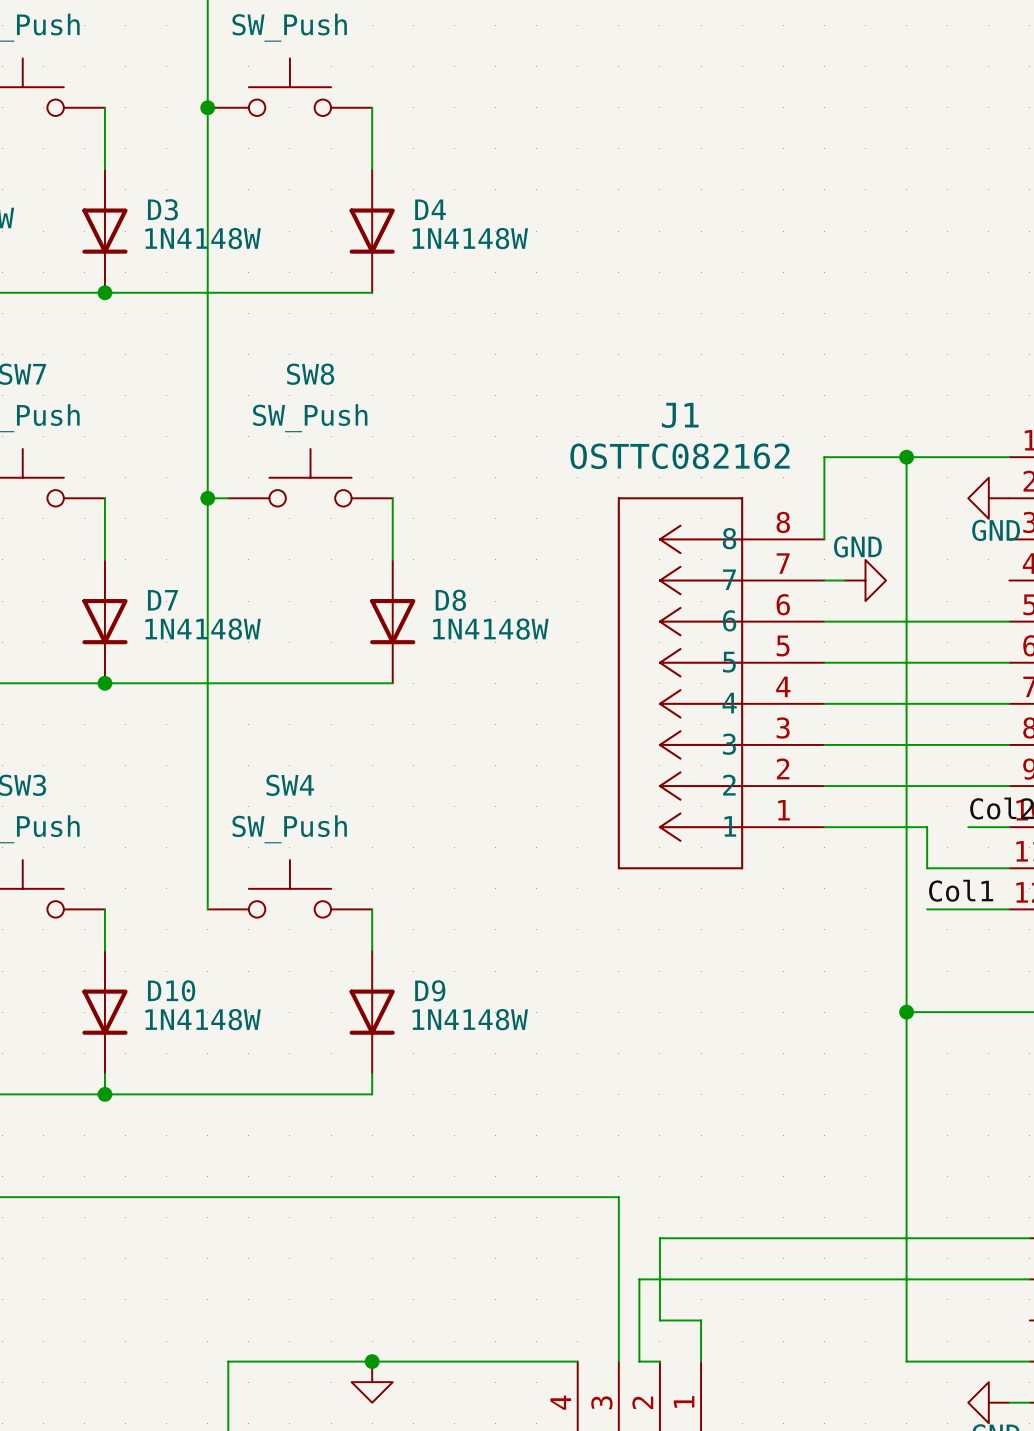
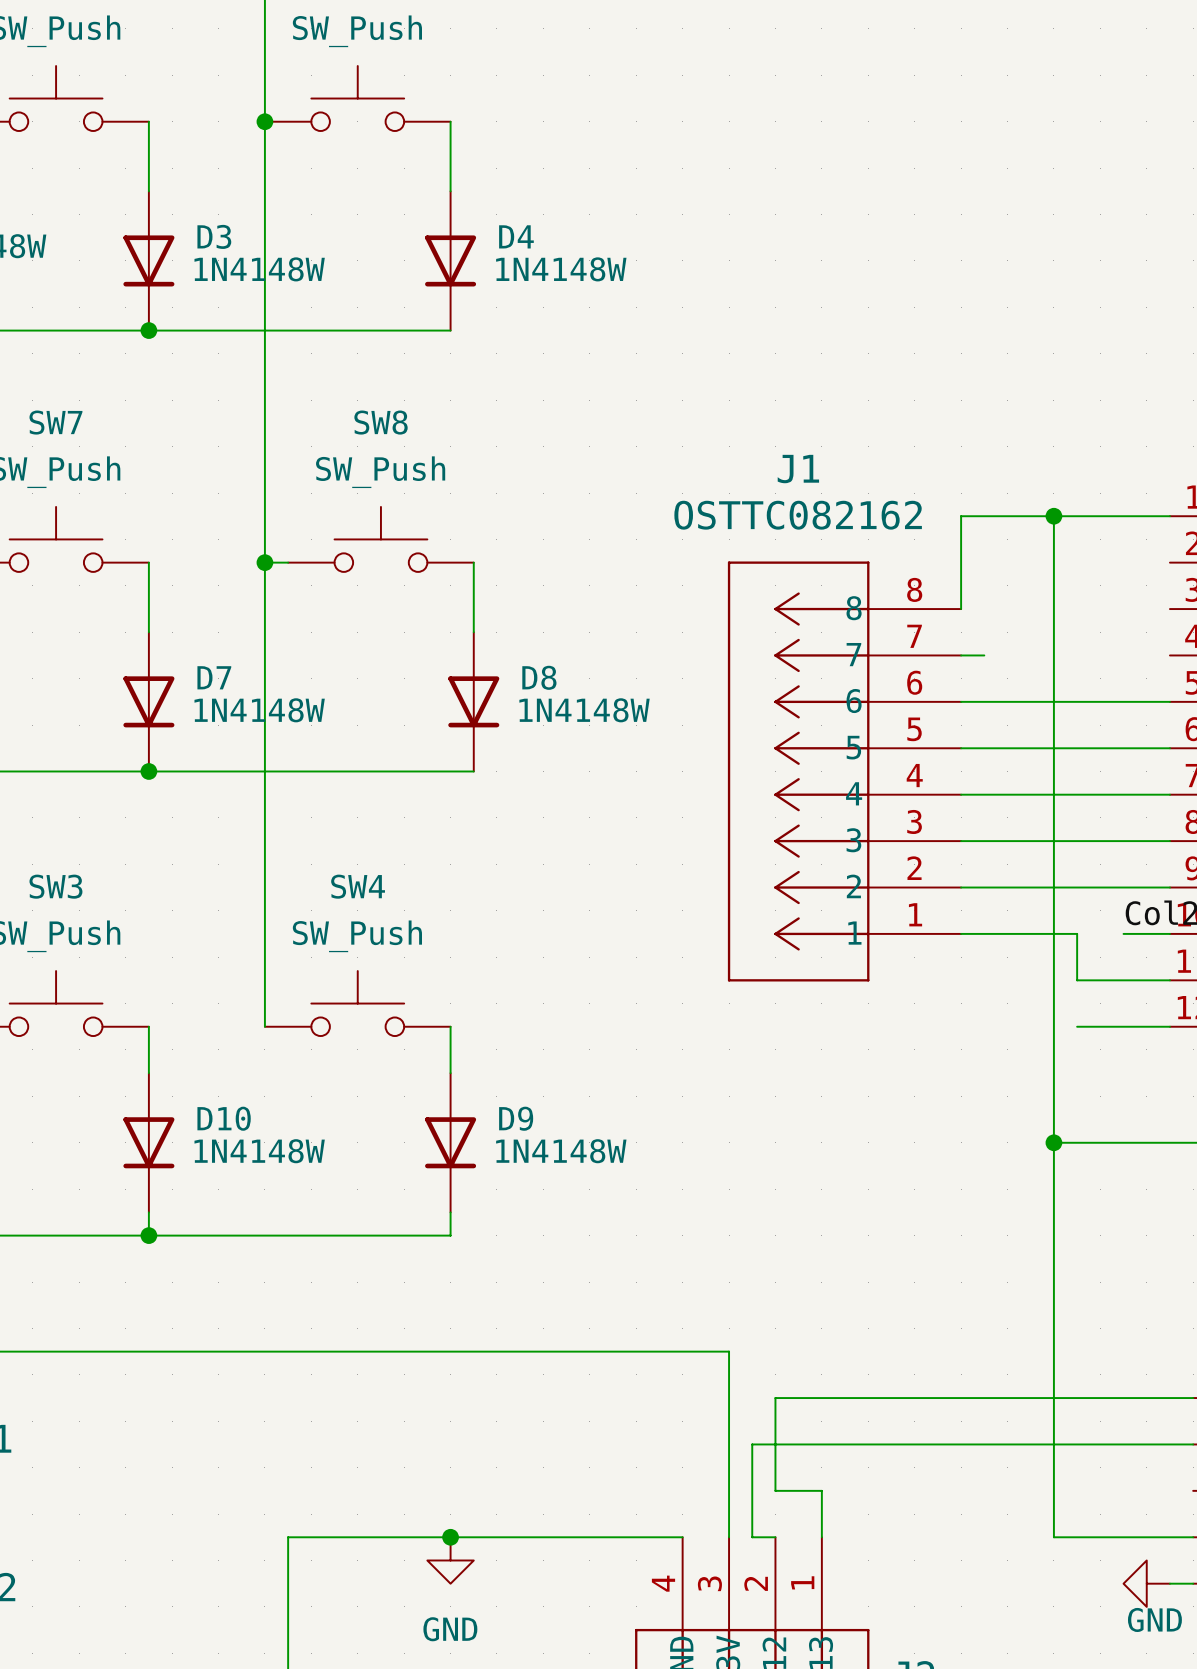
power symbol: GND (988, 498) -> none
power symbol: GND (865, 580) -> none
label: Col1 (961, 890) -> none

